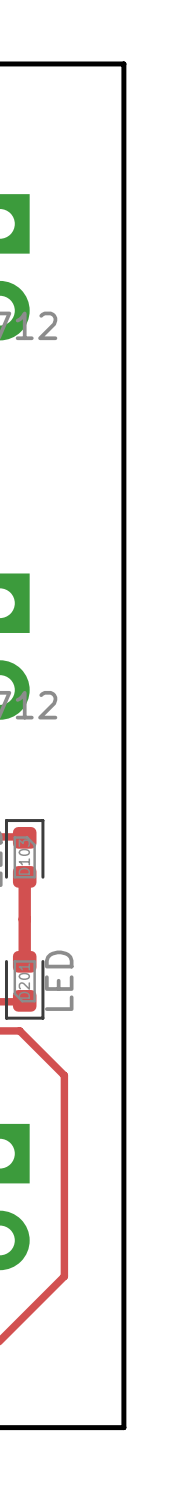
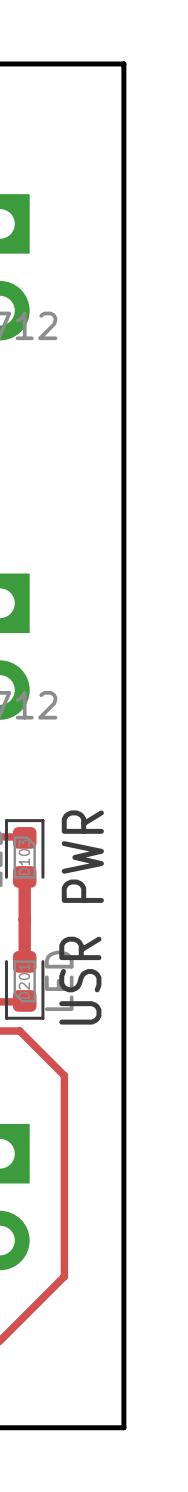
text: none -> PWR (82, 856)
text: none -> USR (80, 980)

